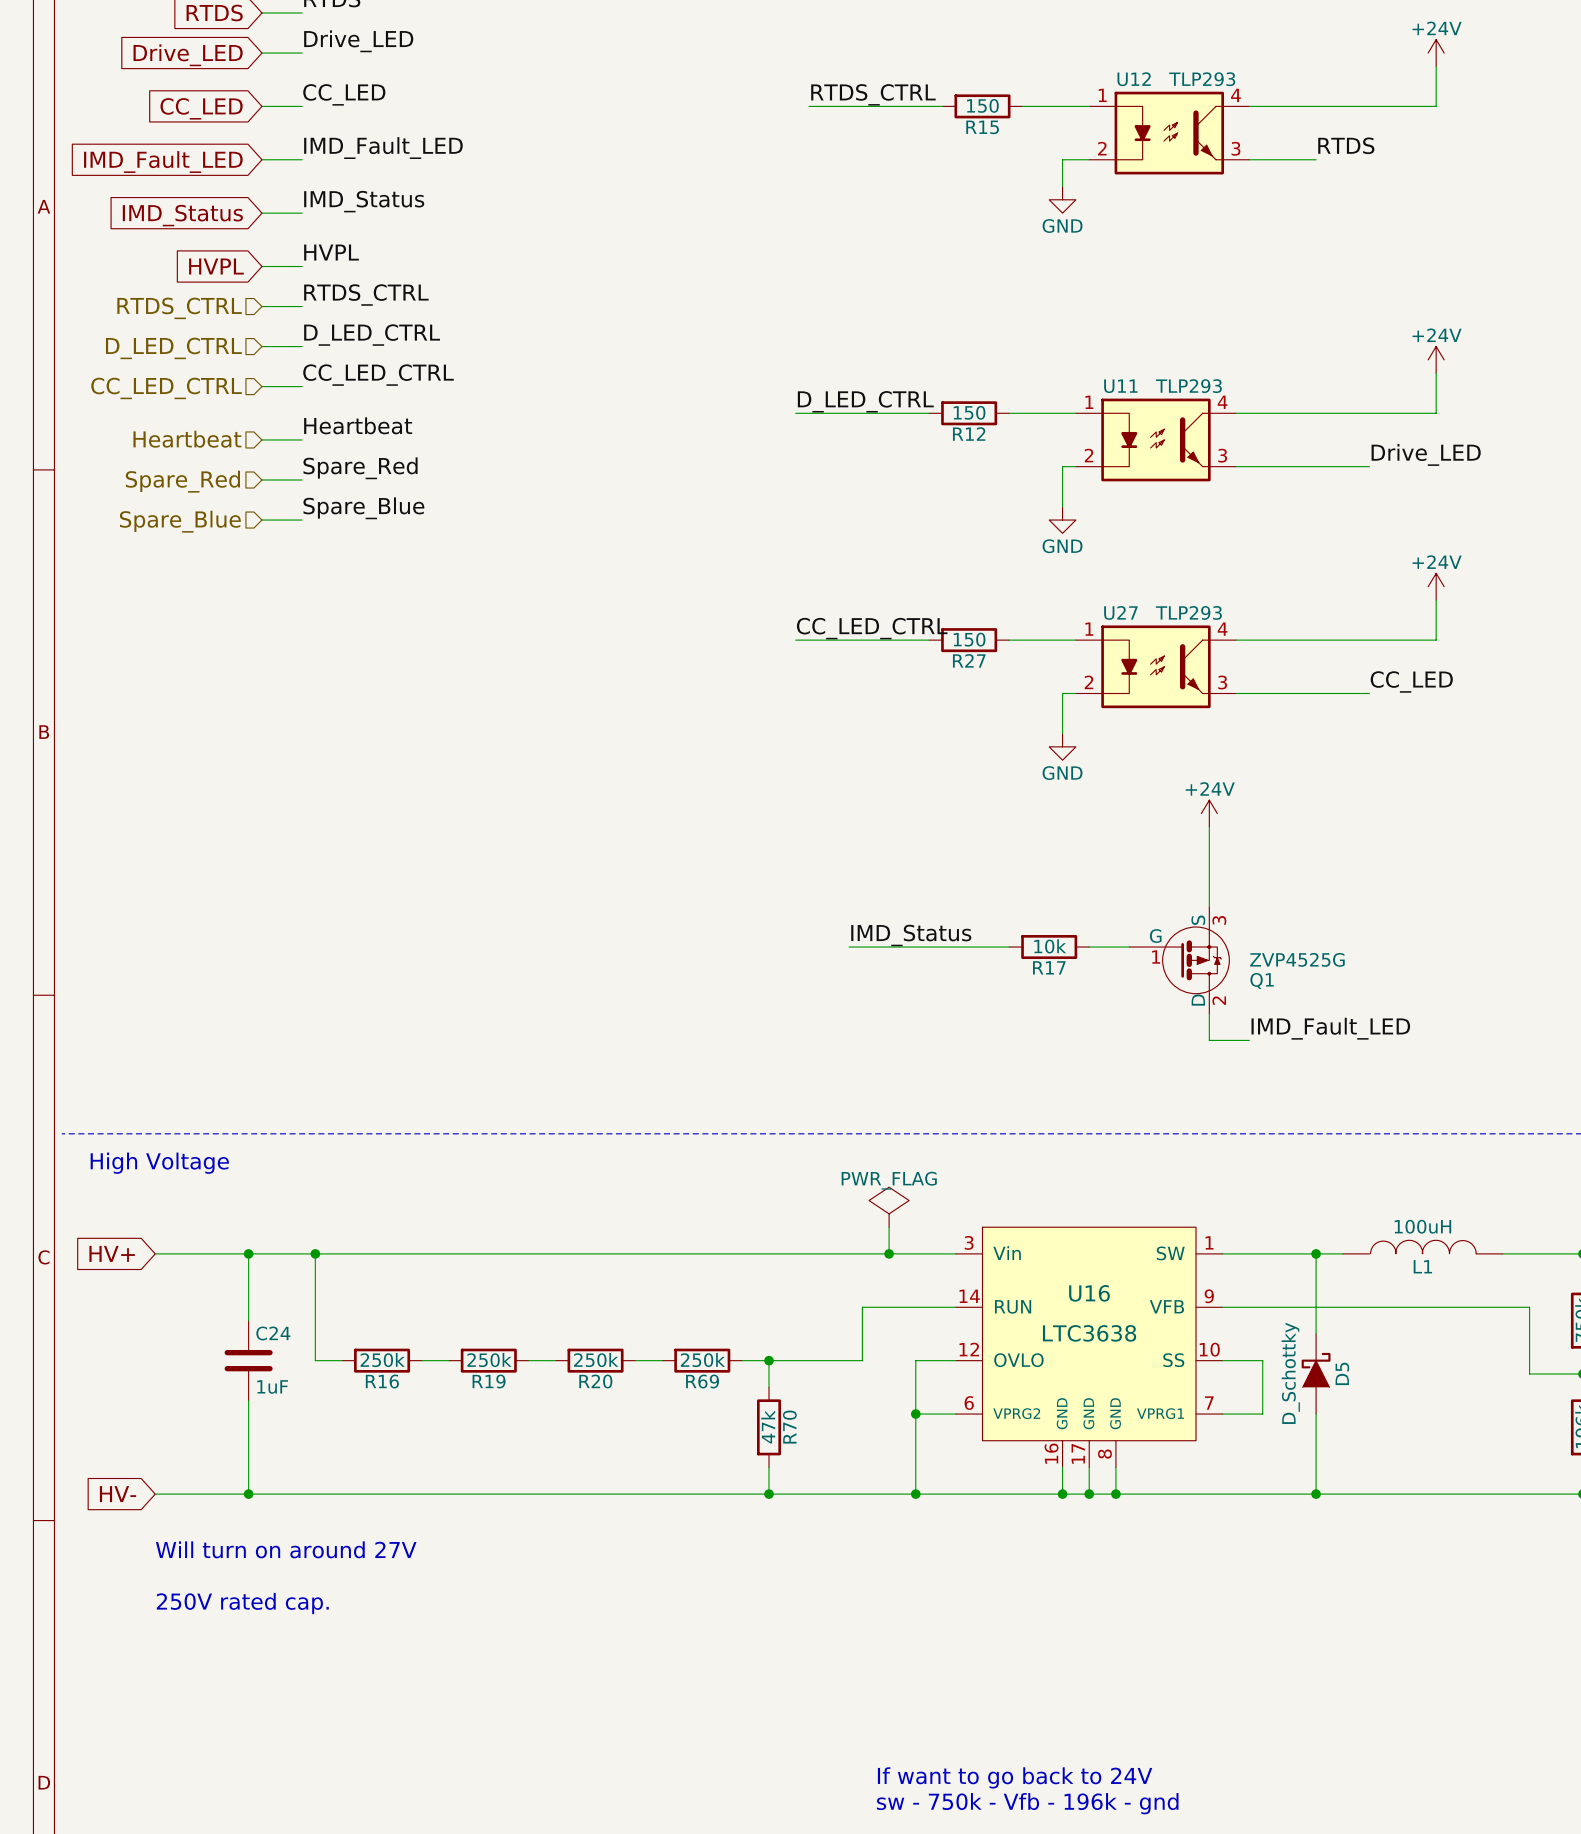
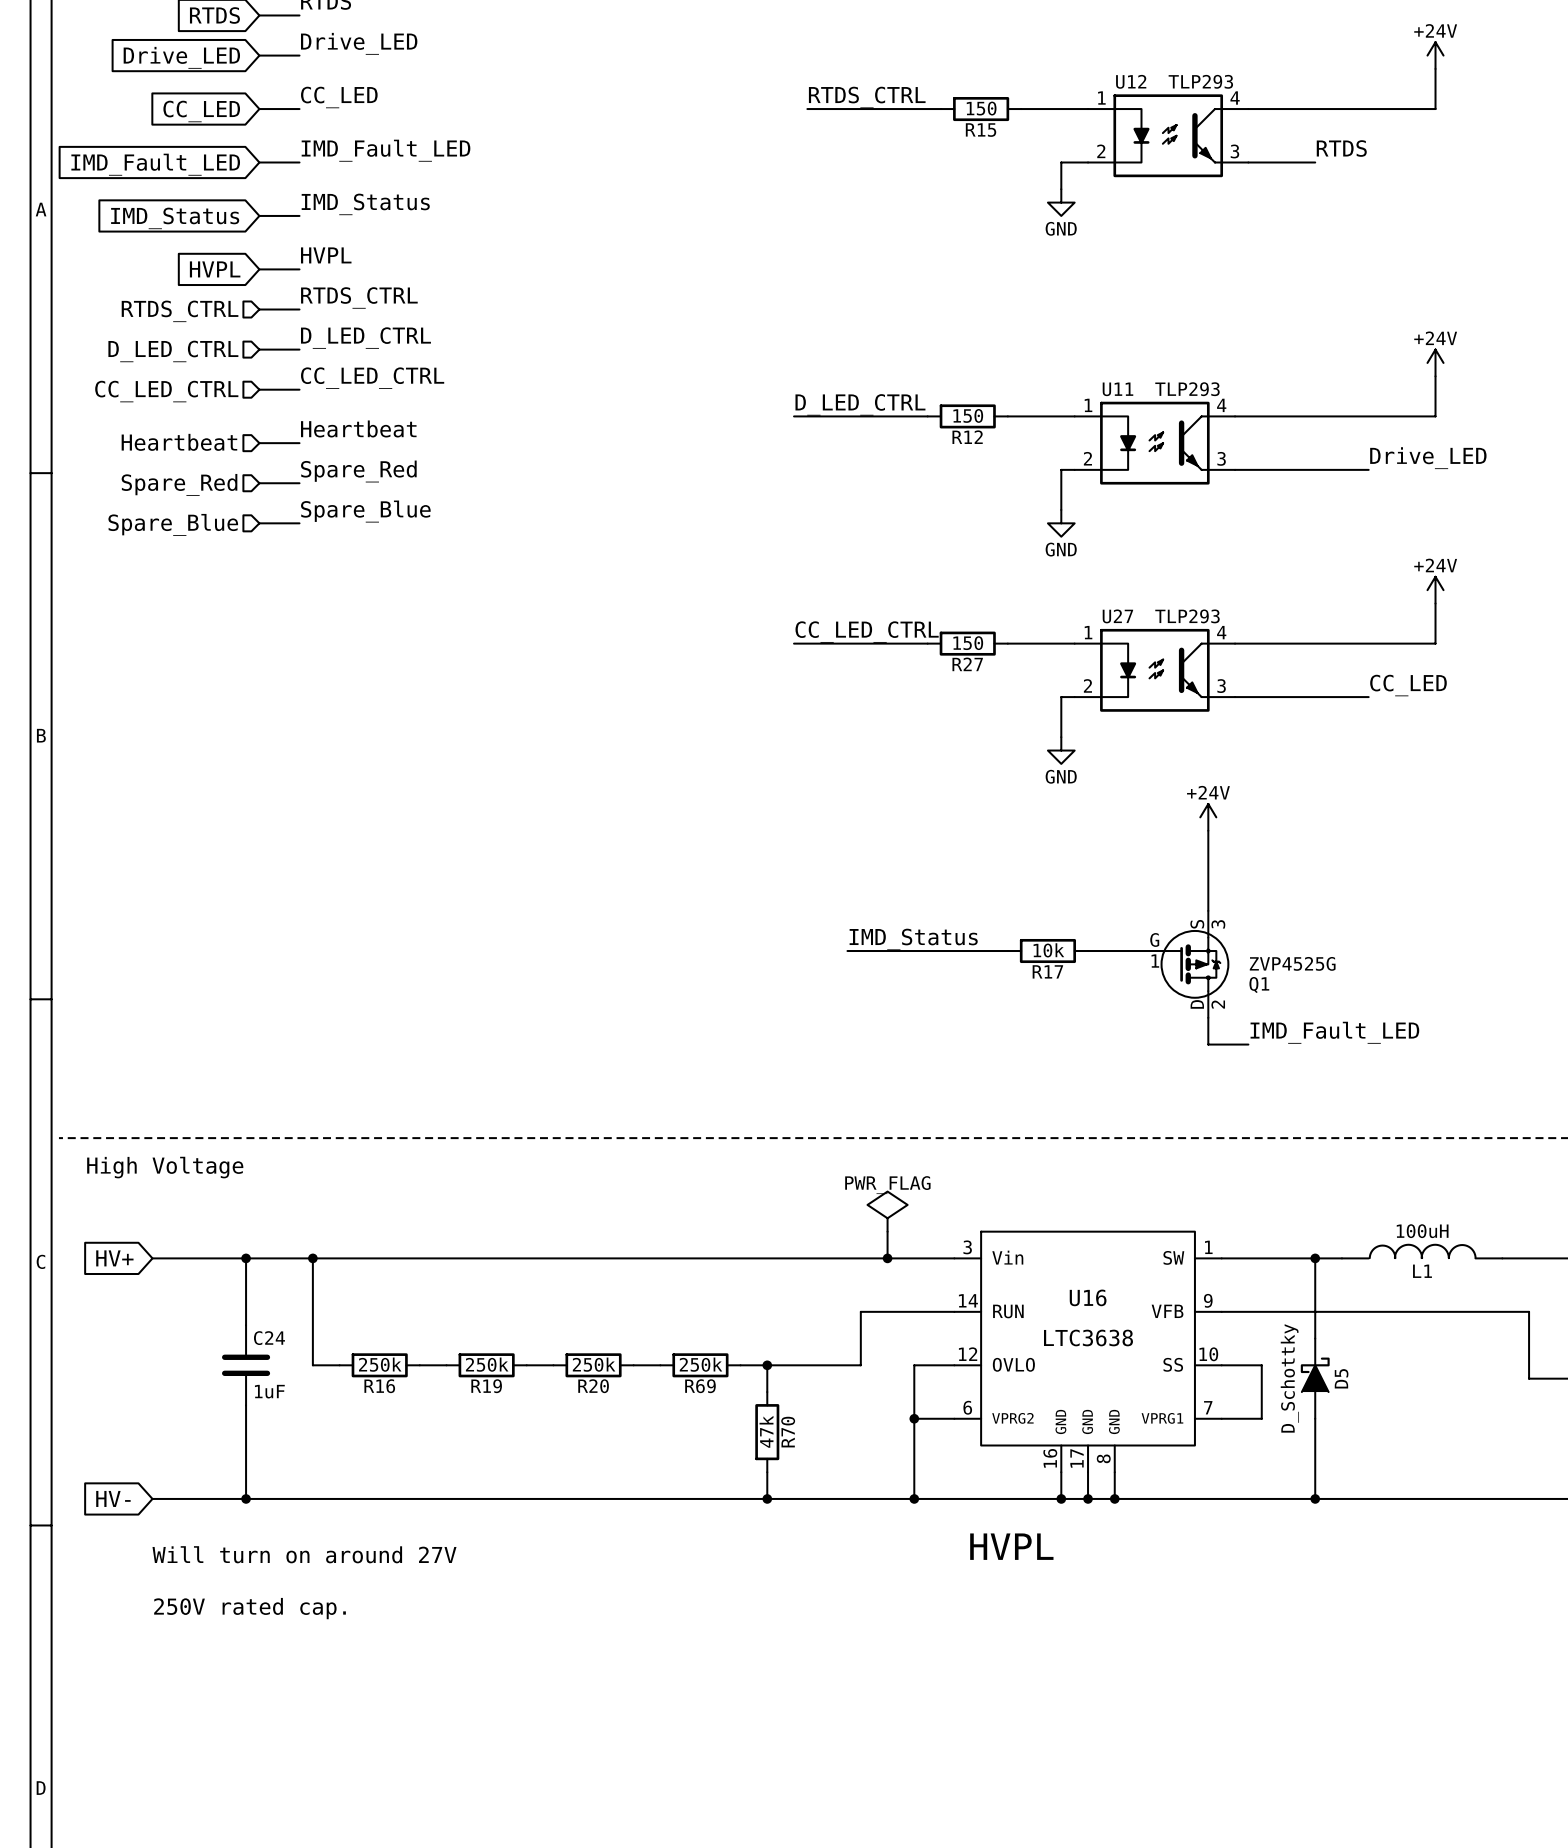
text: none -> HVPL (1011, 1546)
text: If want to go back to 24V (1015, 1777) -> none
text: sw - 750k - Vfb - 196k - gnd (1027, 1803) -> none

